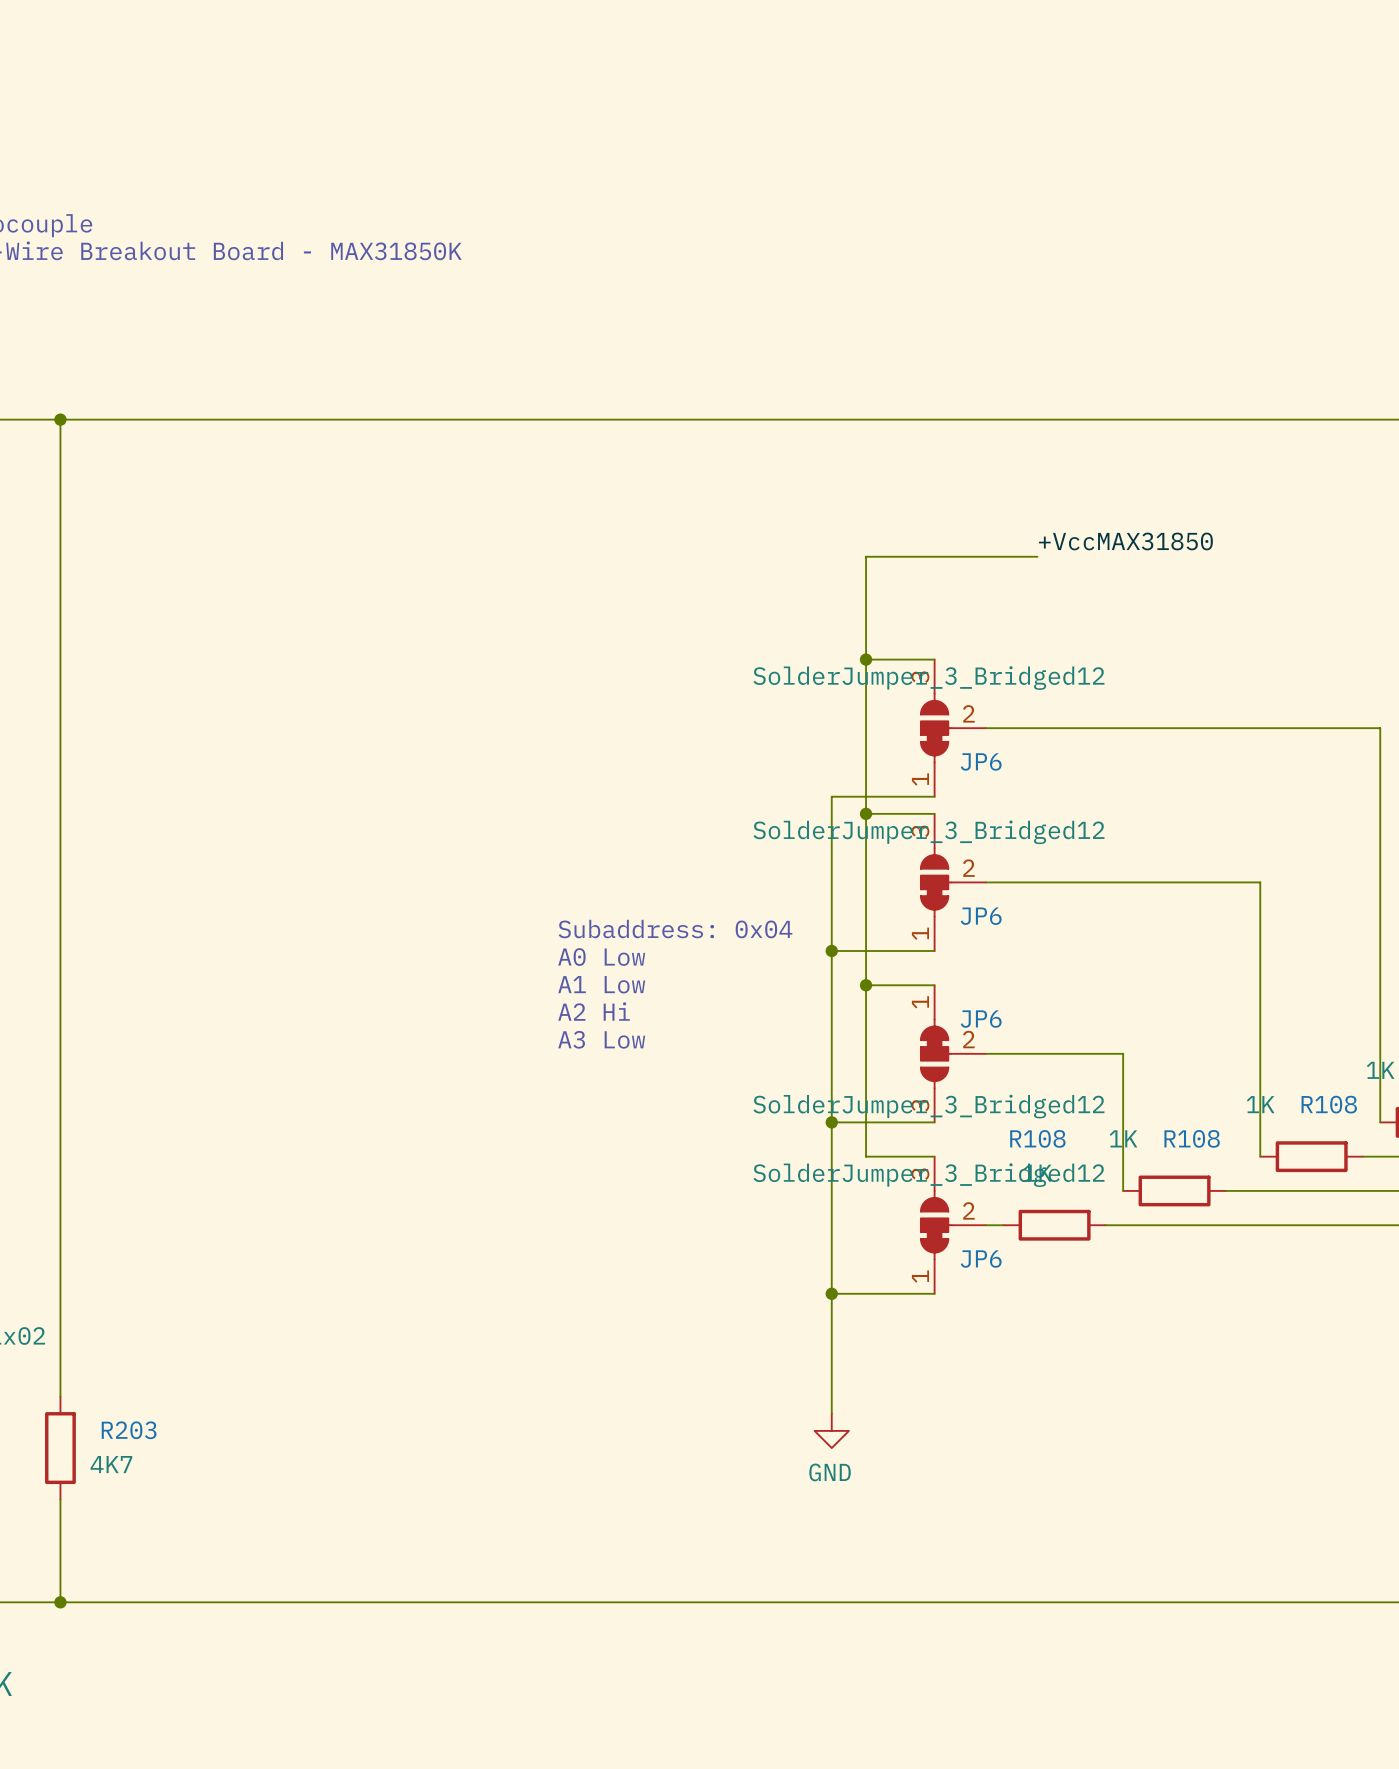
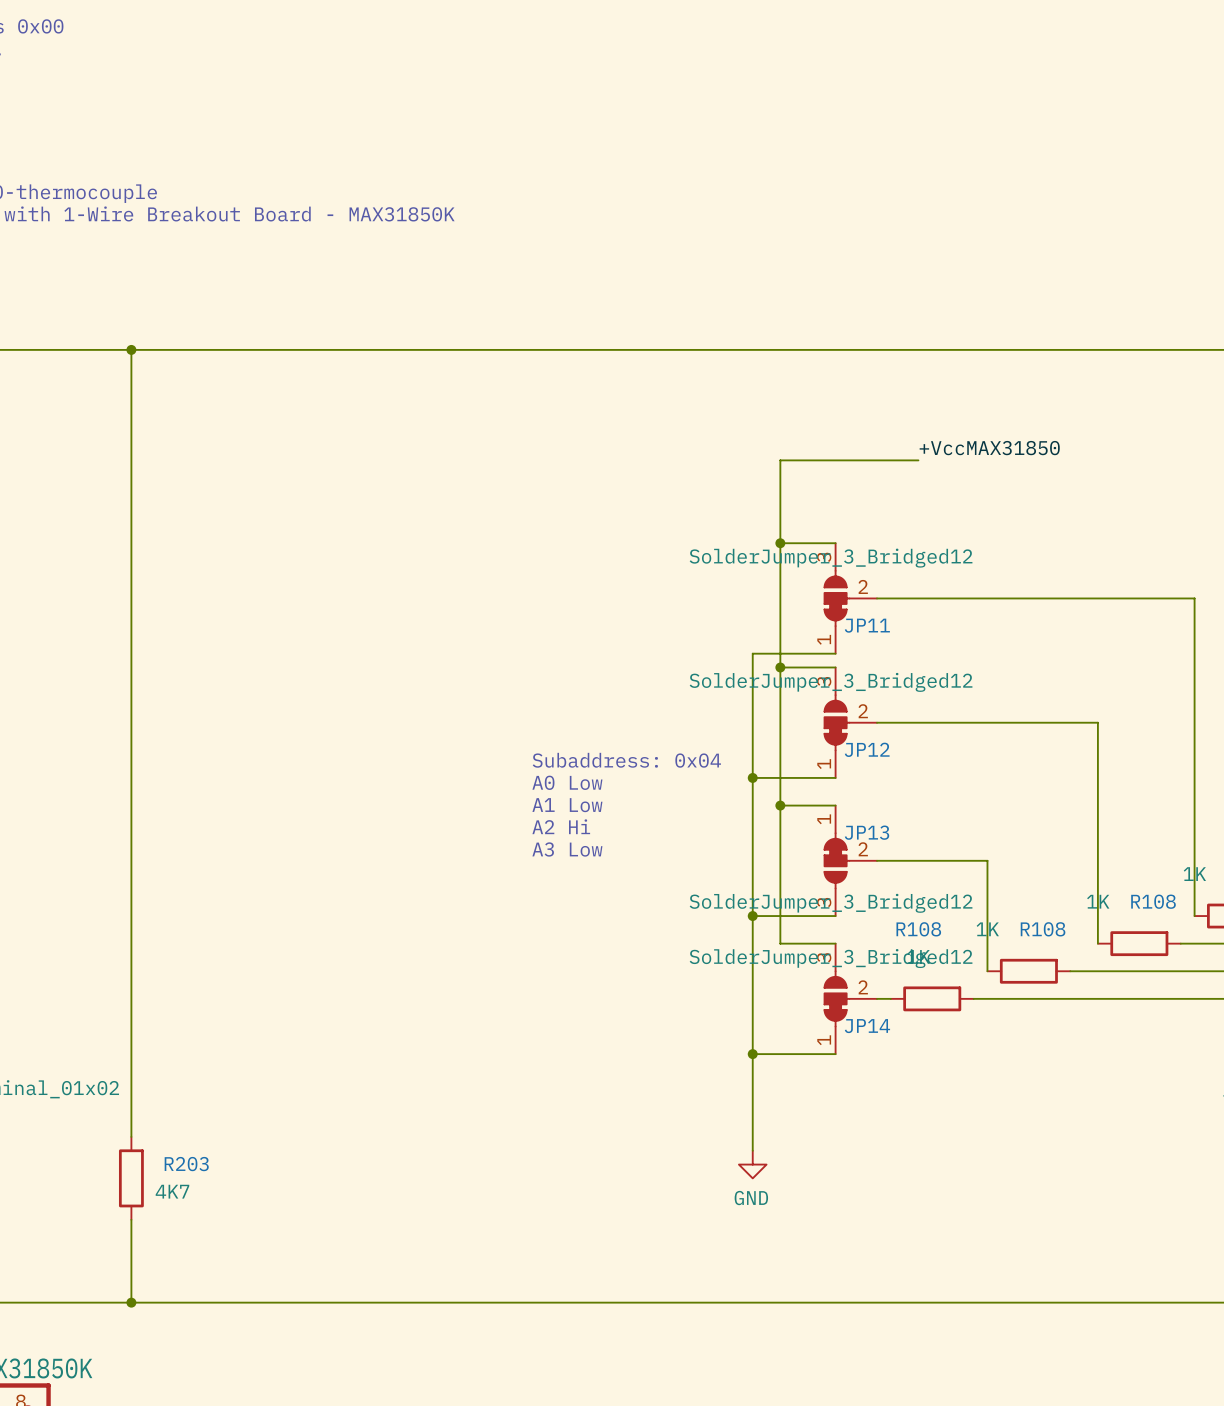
JP6 name: JP6 (981, 761) -> JP11 (867, 625)
JP6 name: JP6 (981, 916) -> JP12 (867, 749)
JP6 name: JP6 (981, 1019) -> JP13 (867, 832)
JP6 name: JP6 (981, 1259) -> JP14 (867, 1026)

